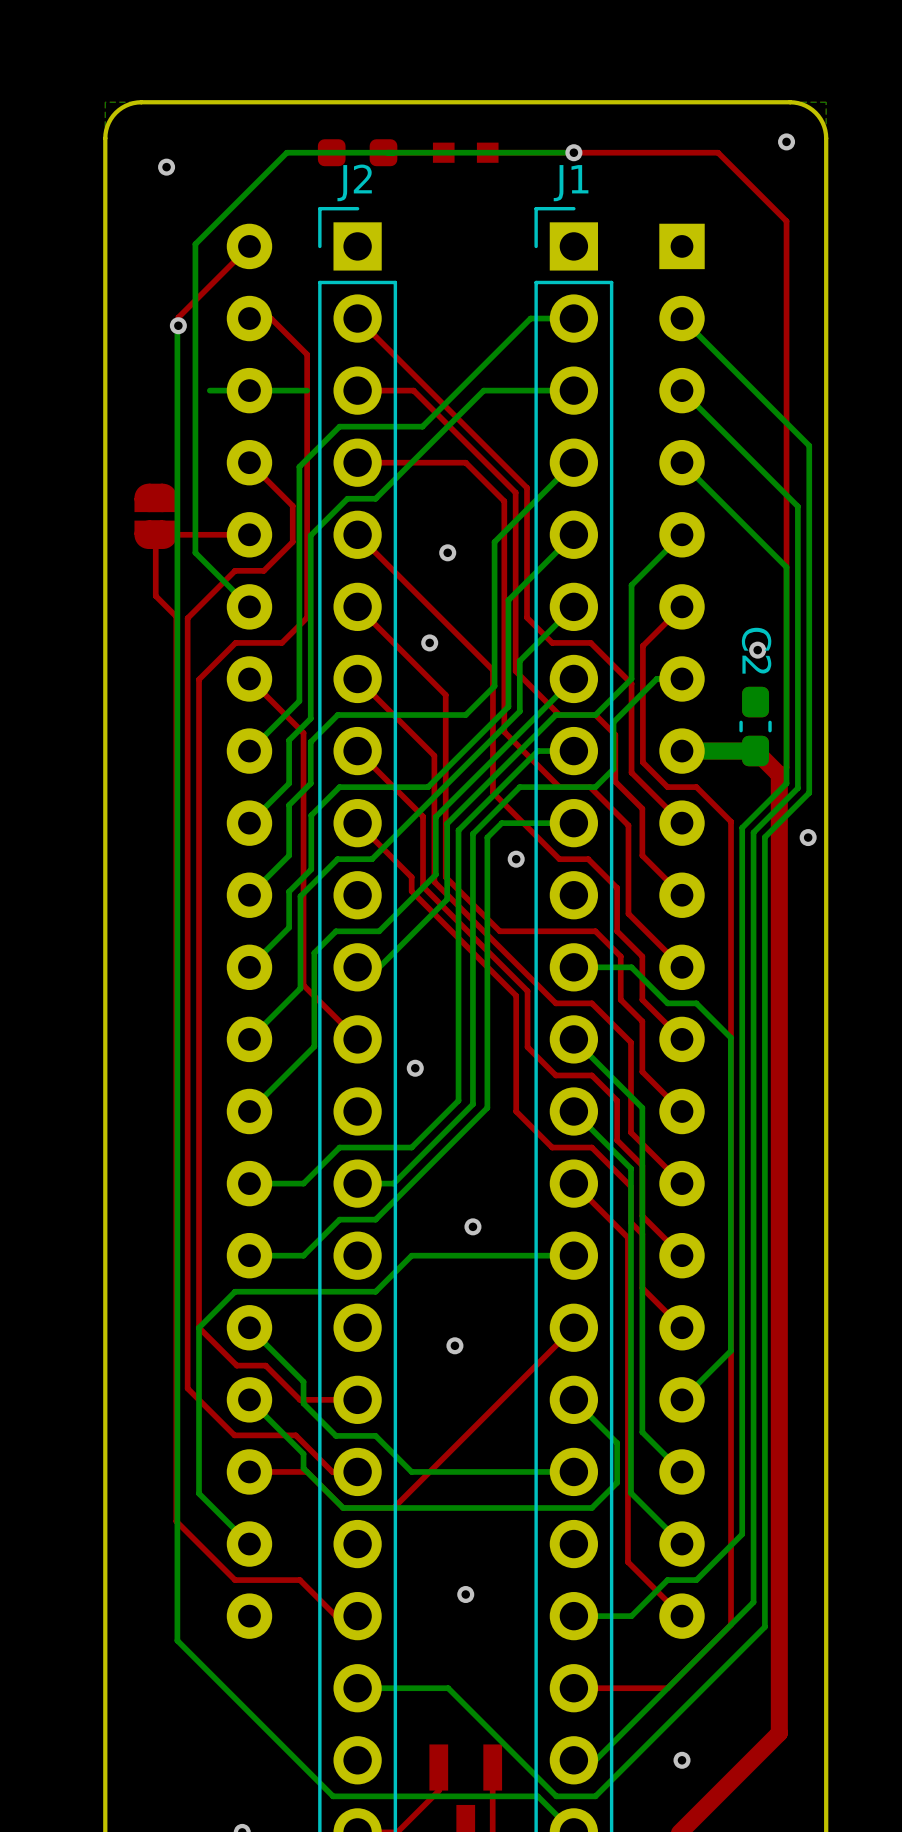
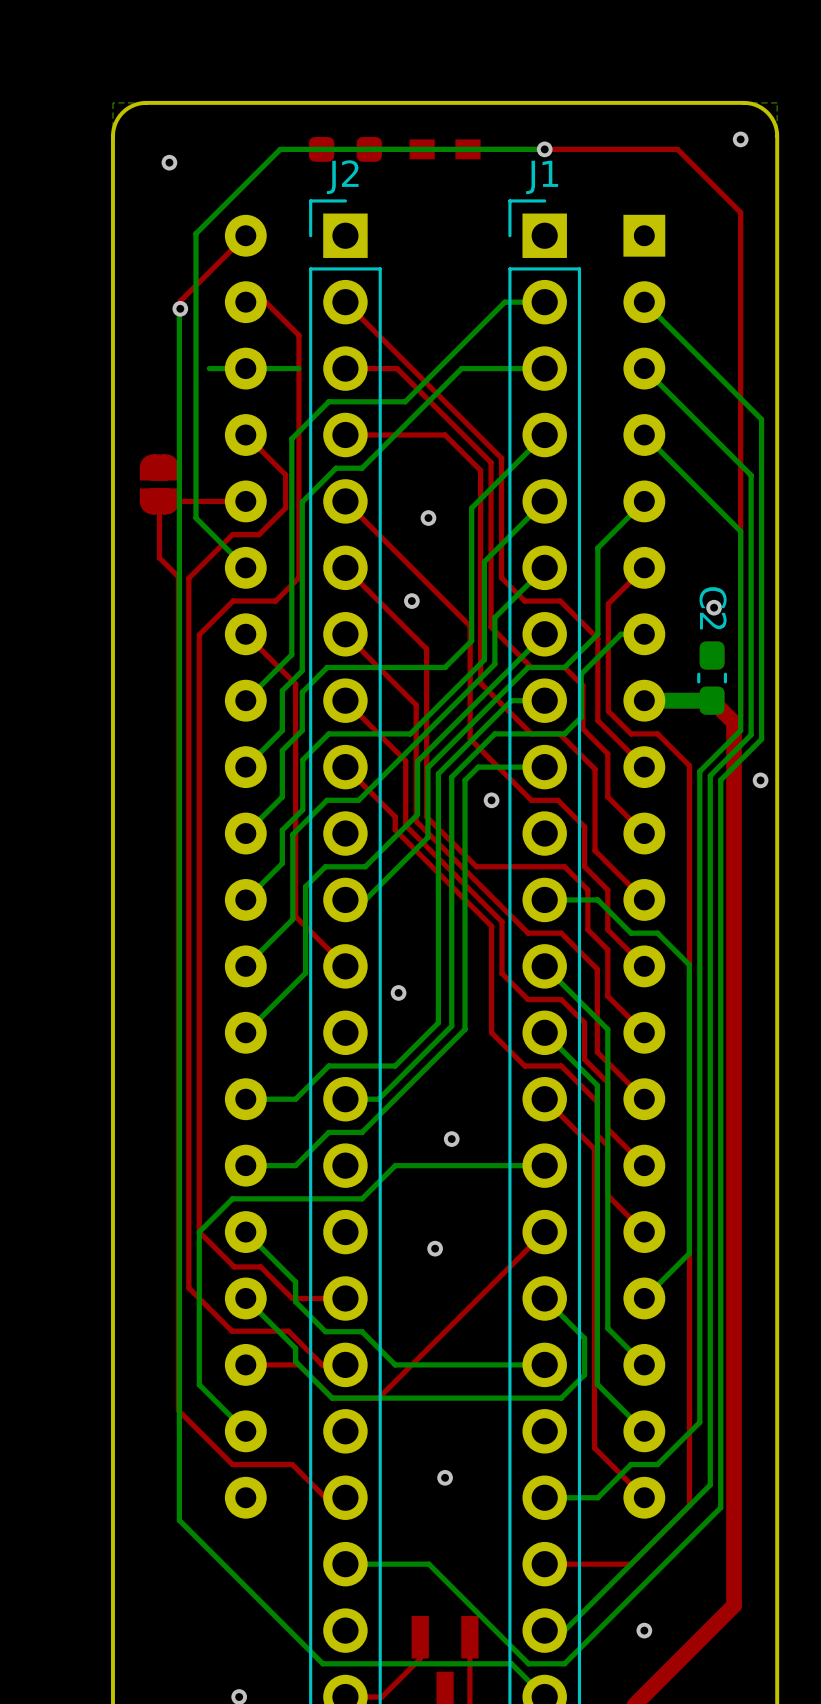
part footprint: [432, 142, 499, 163] -> [409, 139, 481, 160]

